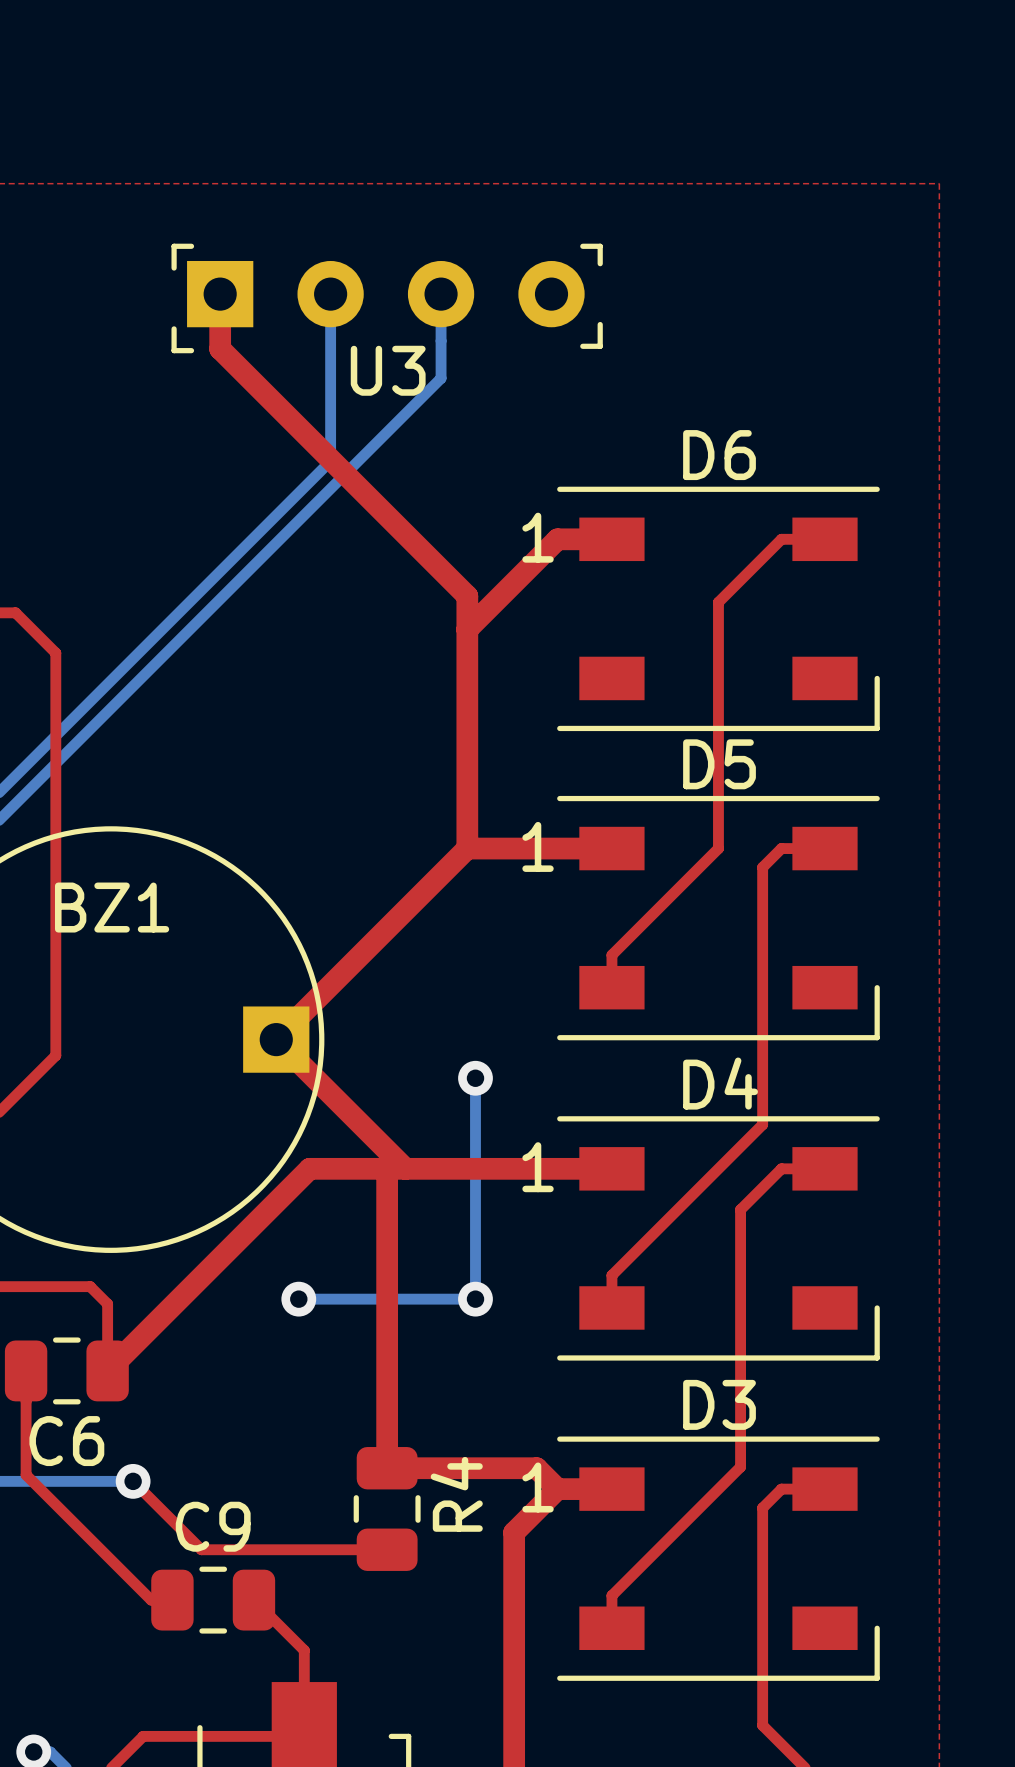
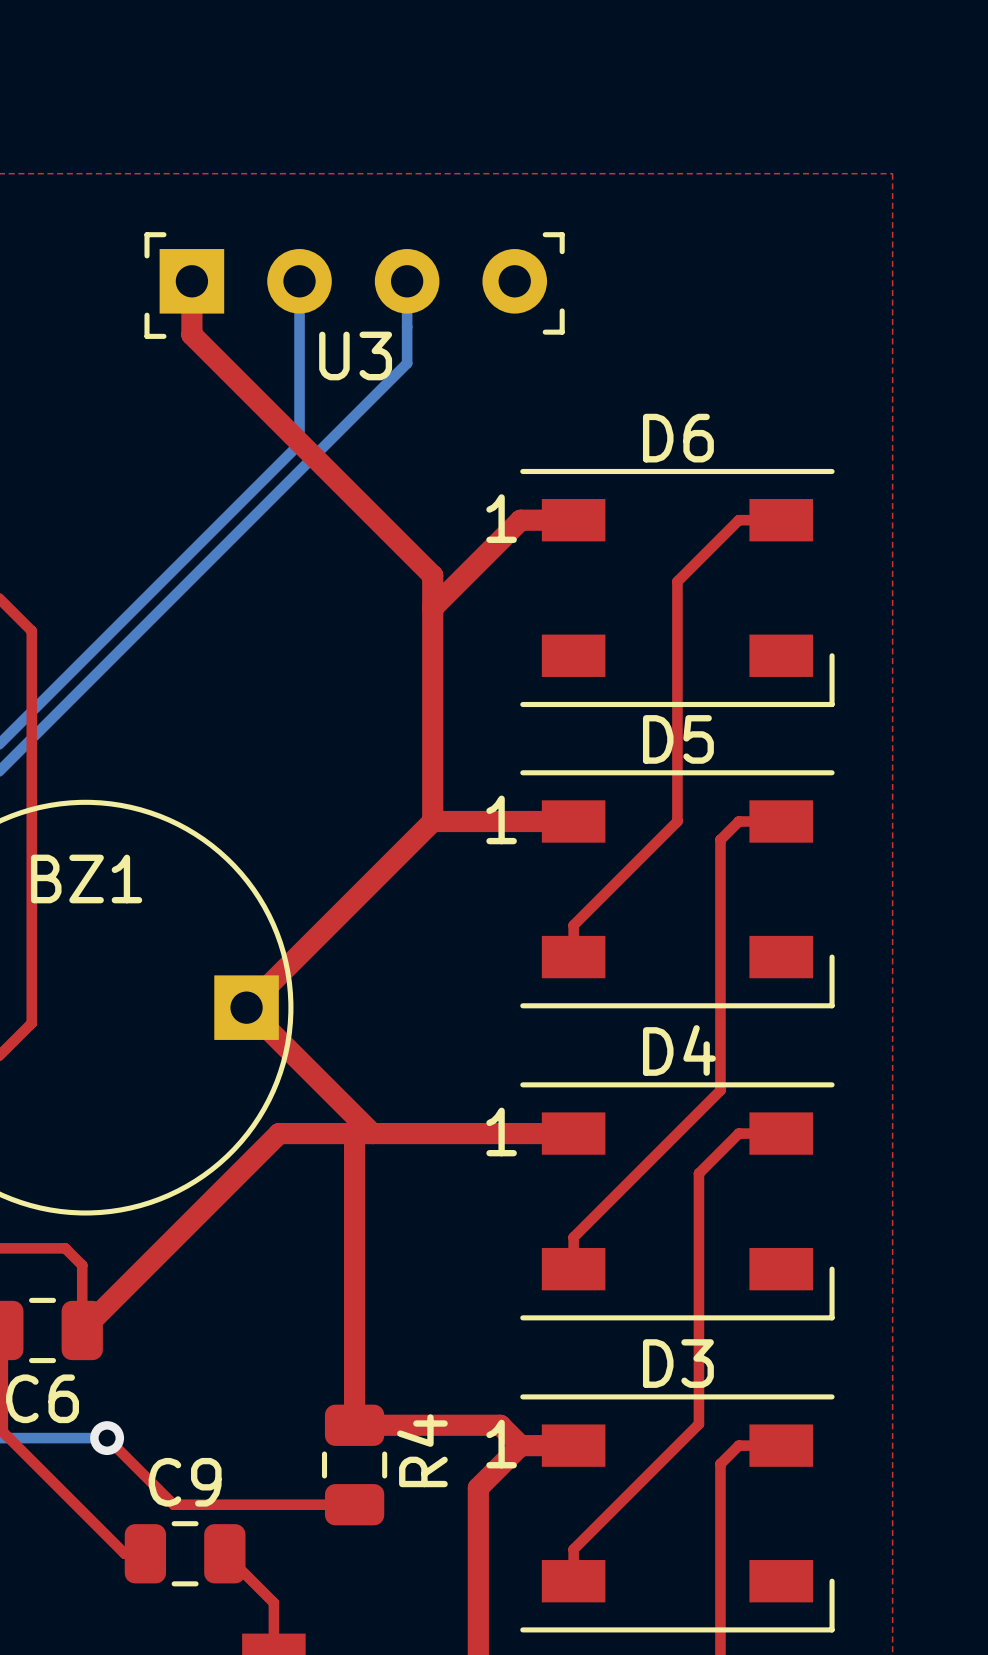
bottom track: (475, 1078) (475, 1299) (298, 1299) -> none
via: (475, 1078) -> none
via: (298, 1299) -> none
via: (475, 1299) -> none

